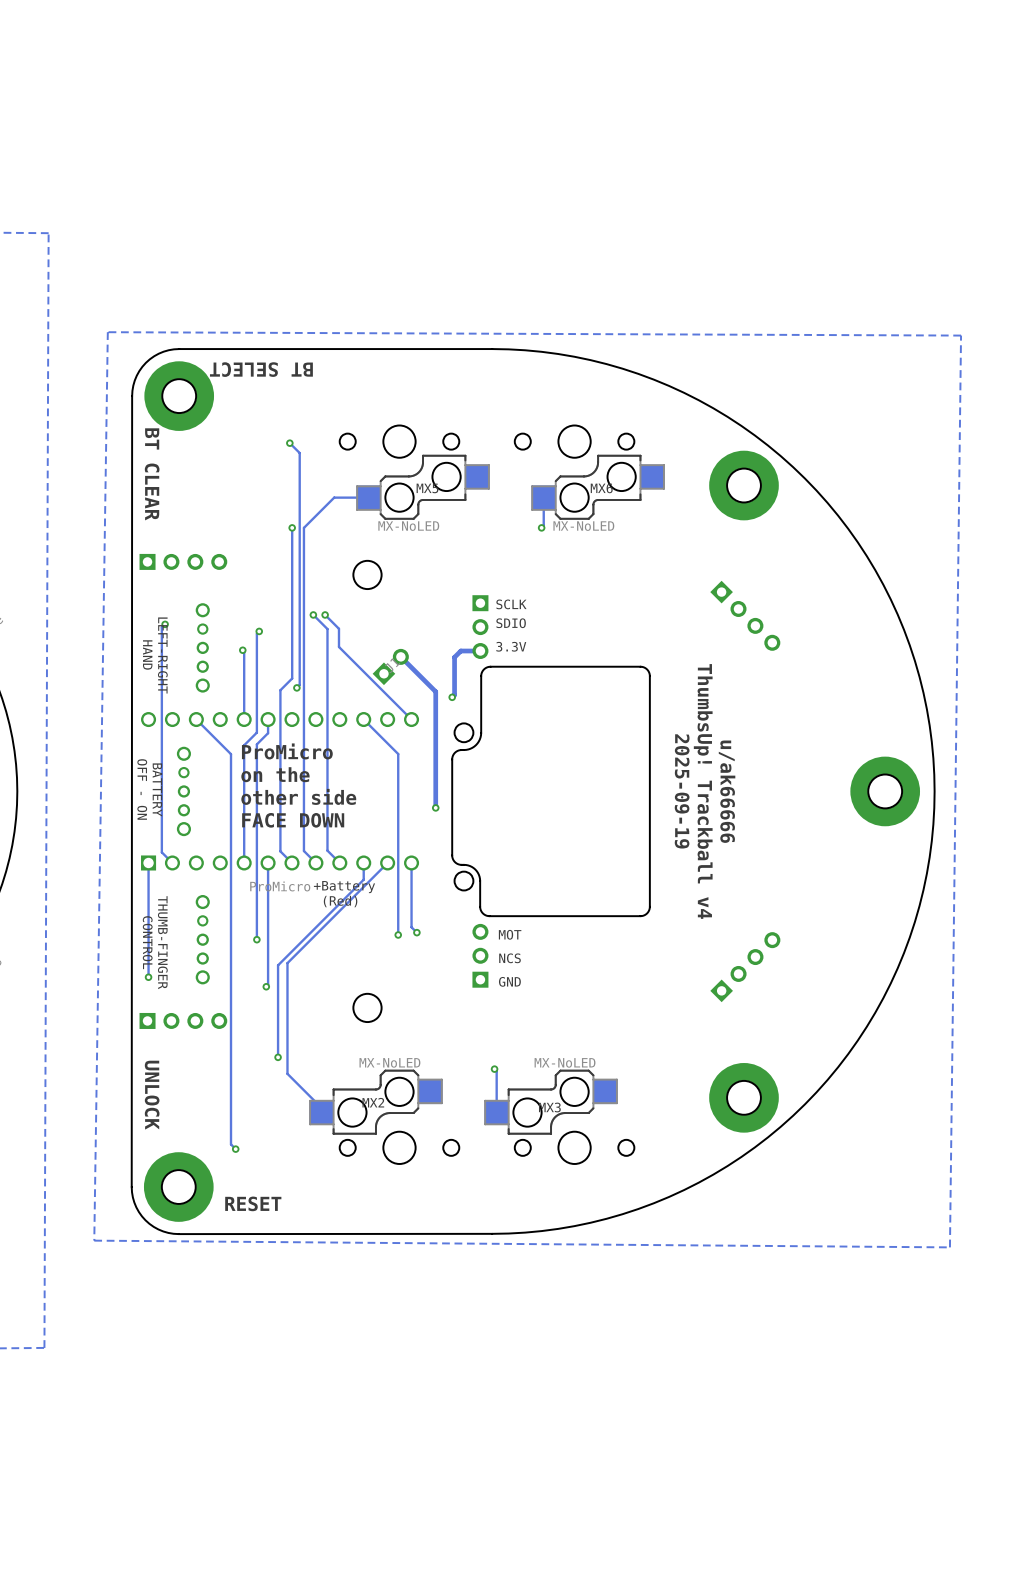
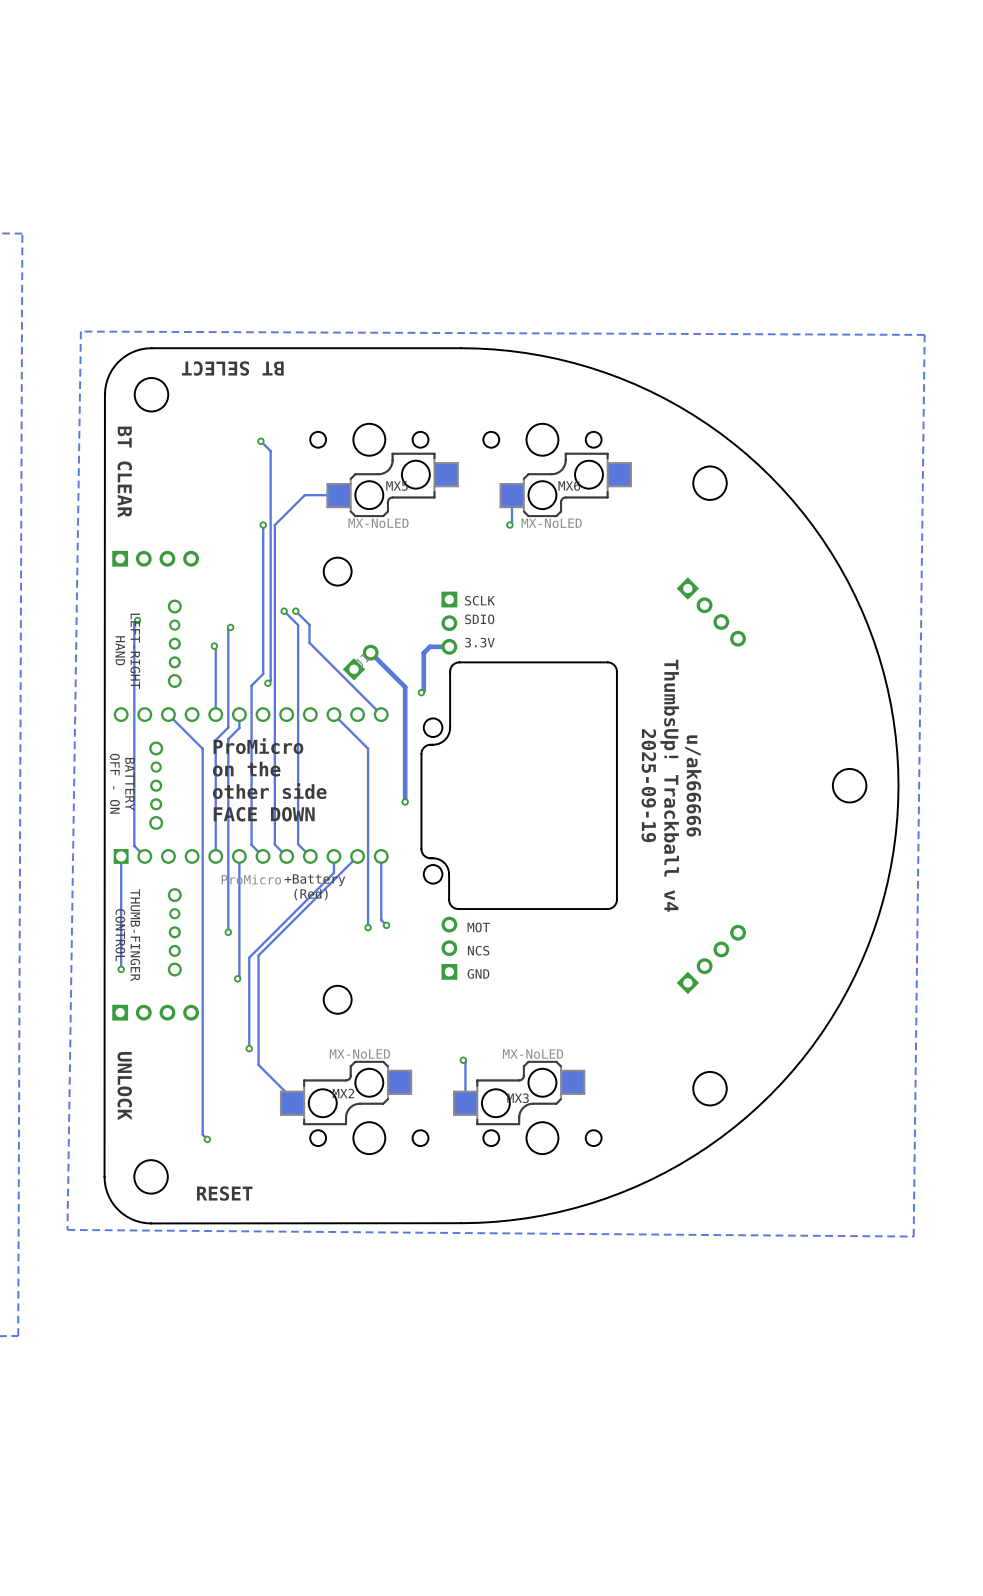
part: (179, 396) -> none
part: (744, 485) -> none
part: (885, 791) -> none
part: (744, 1097) -> none
part: (178, 1187) -> none

